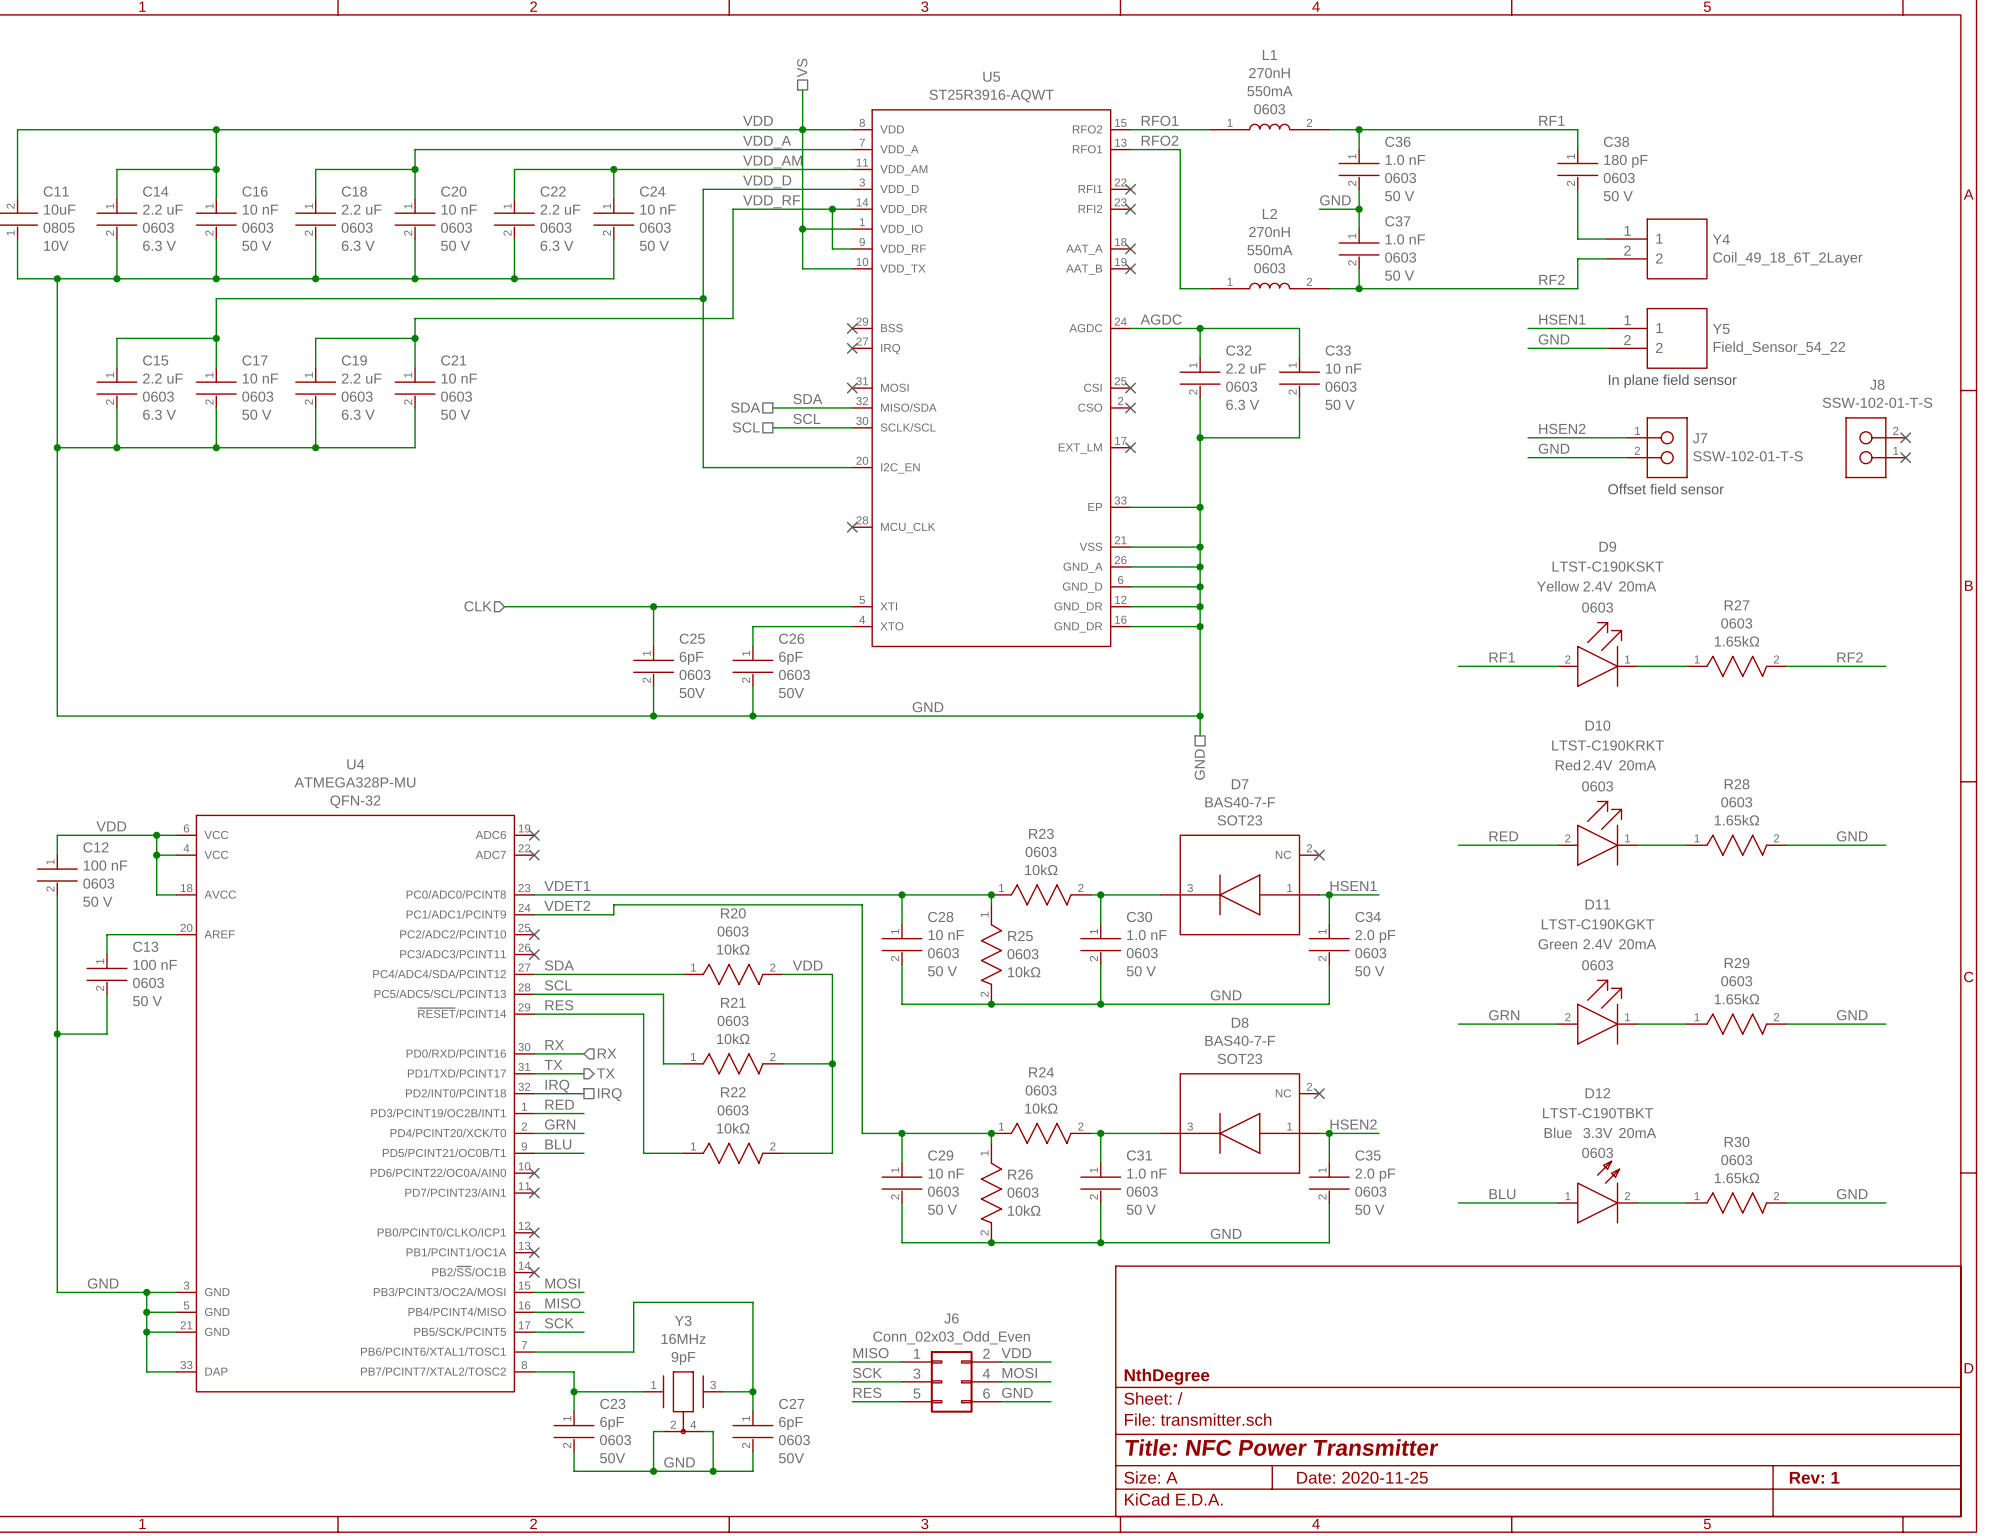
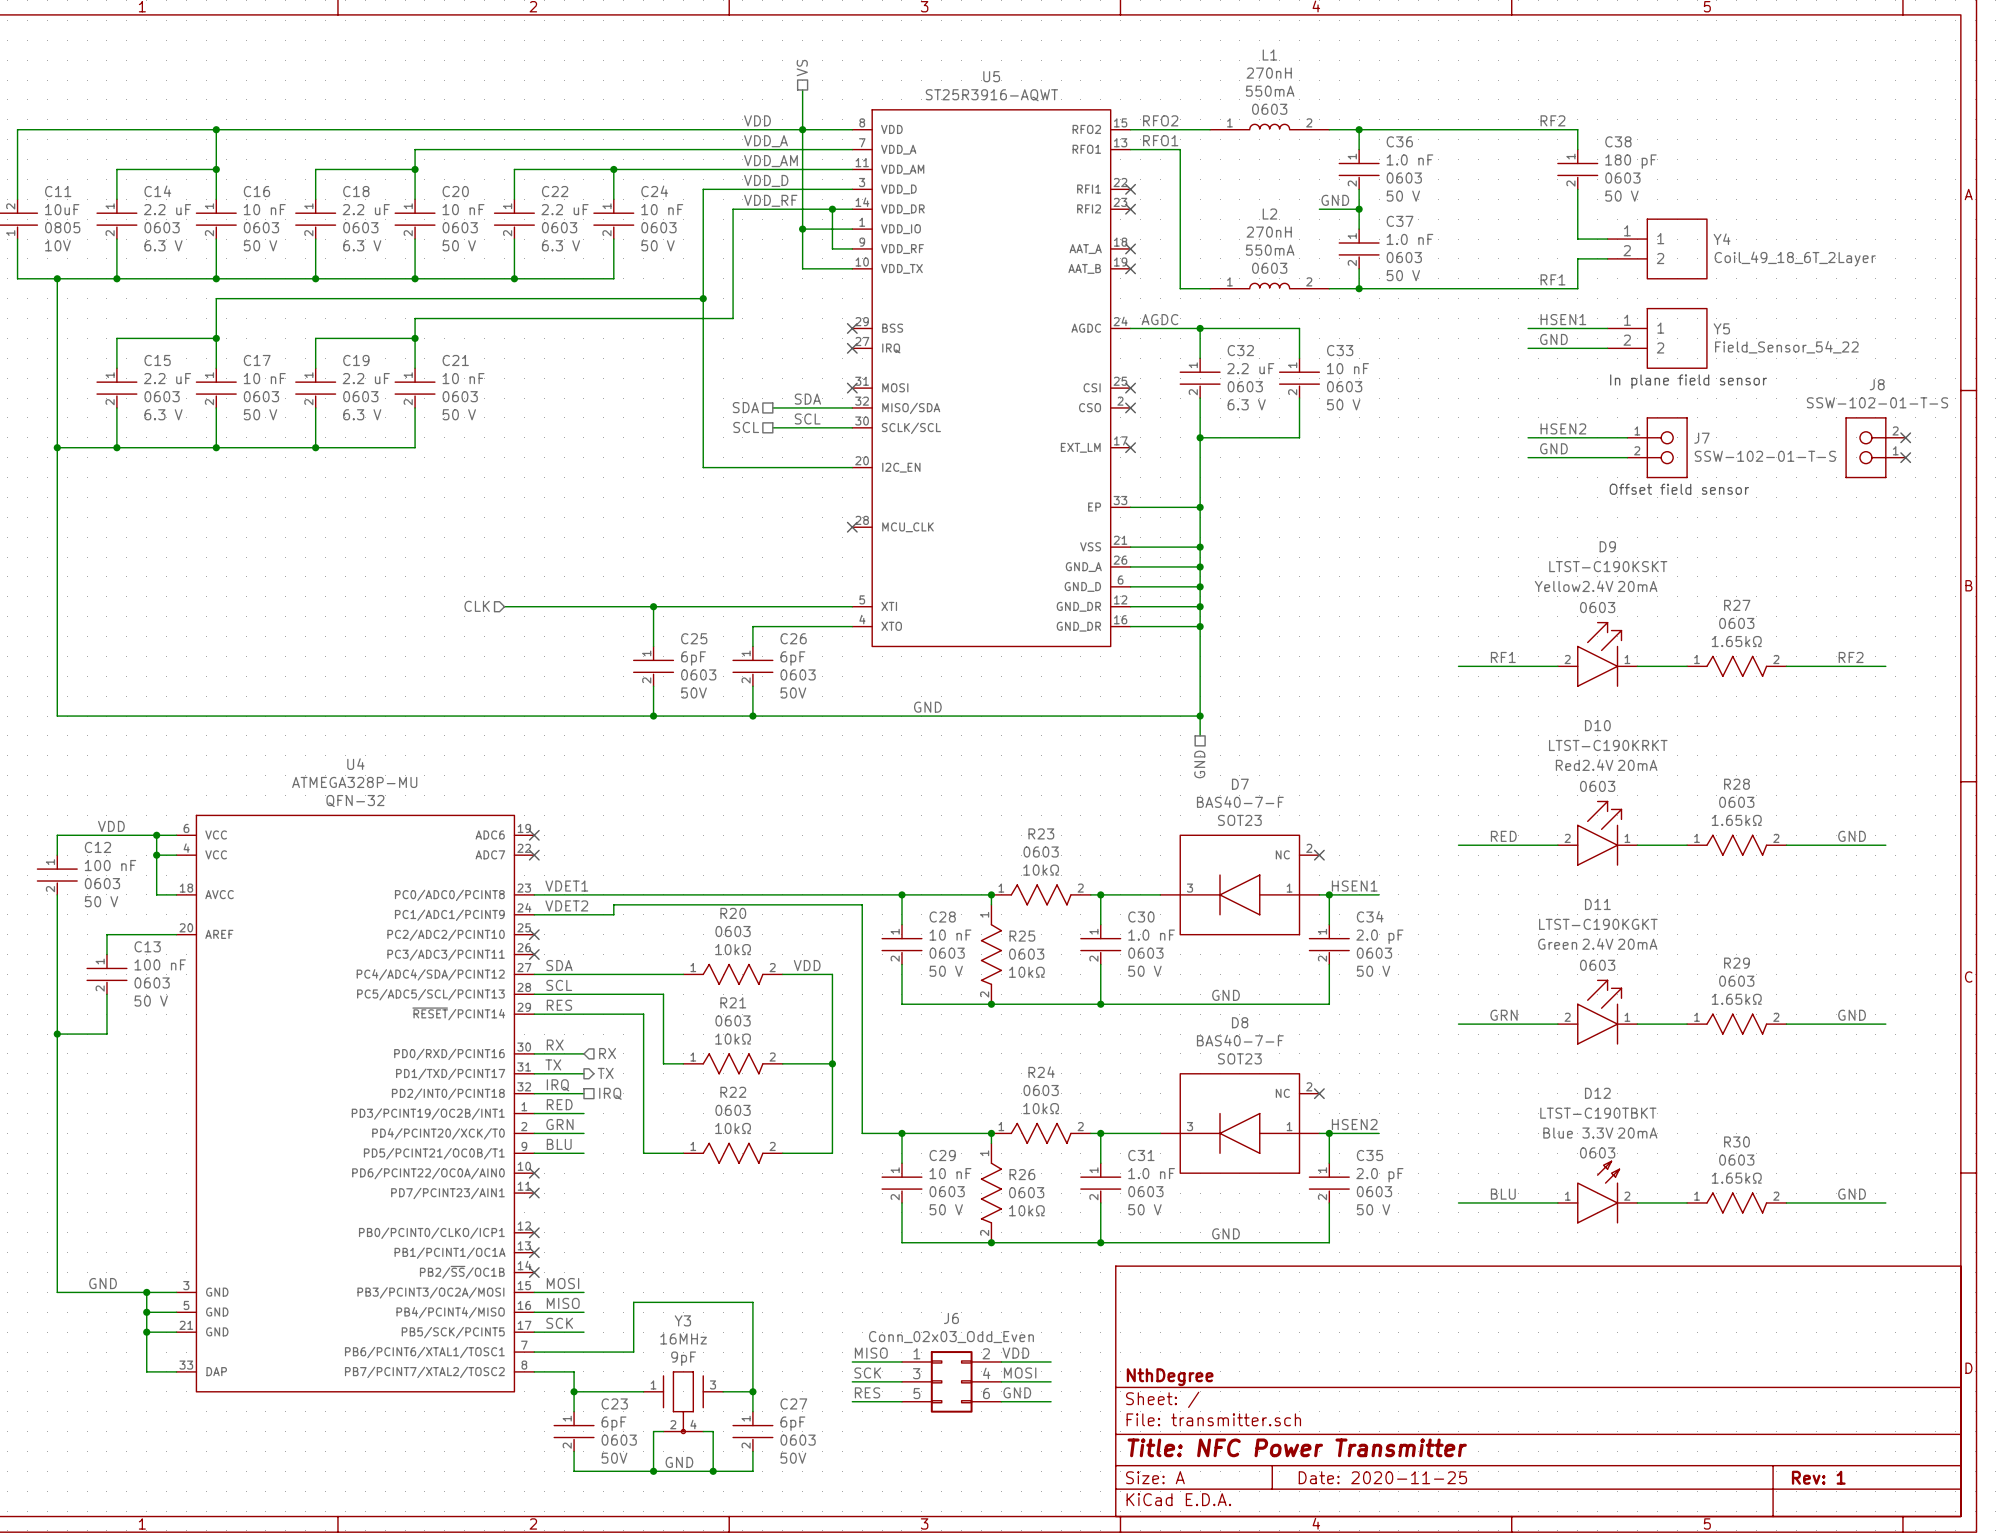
label: RFO1 (1160, 120) -> RFO2 (1160, 120)
label: RF1 (1551, 120) -> RF2 (1552, 120)
label: RFO2 (1159, 140) -> RFO1 (1160, 140)
label: RF2 (1551, 279) -> RF1 (1552, 279)

